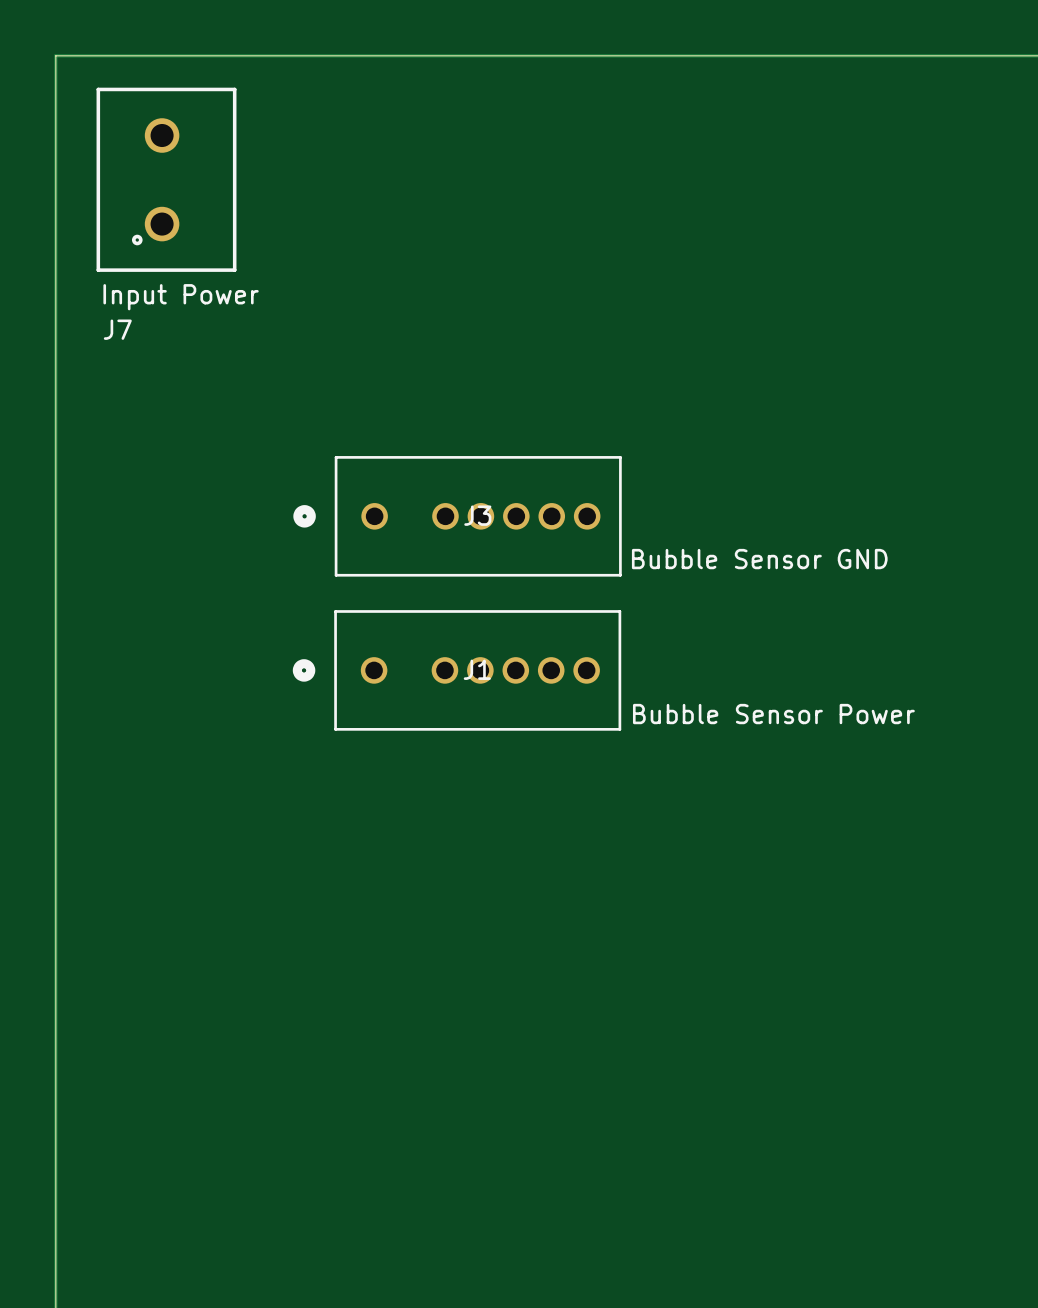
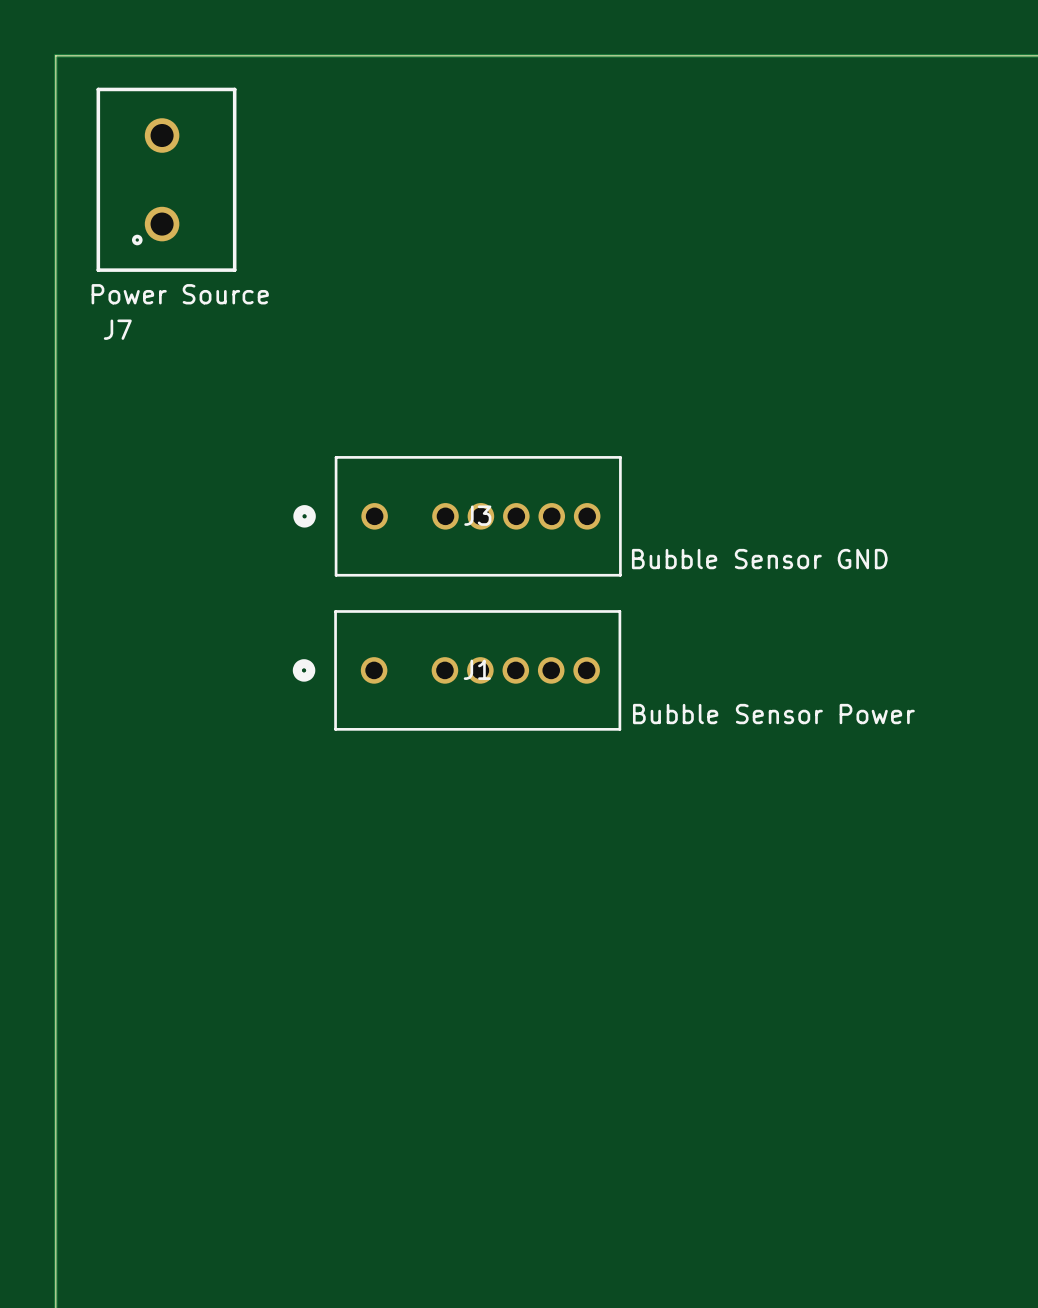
J7 value: Input Power (181, 297) -> Power Source (180, 294)

